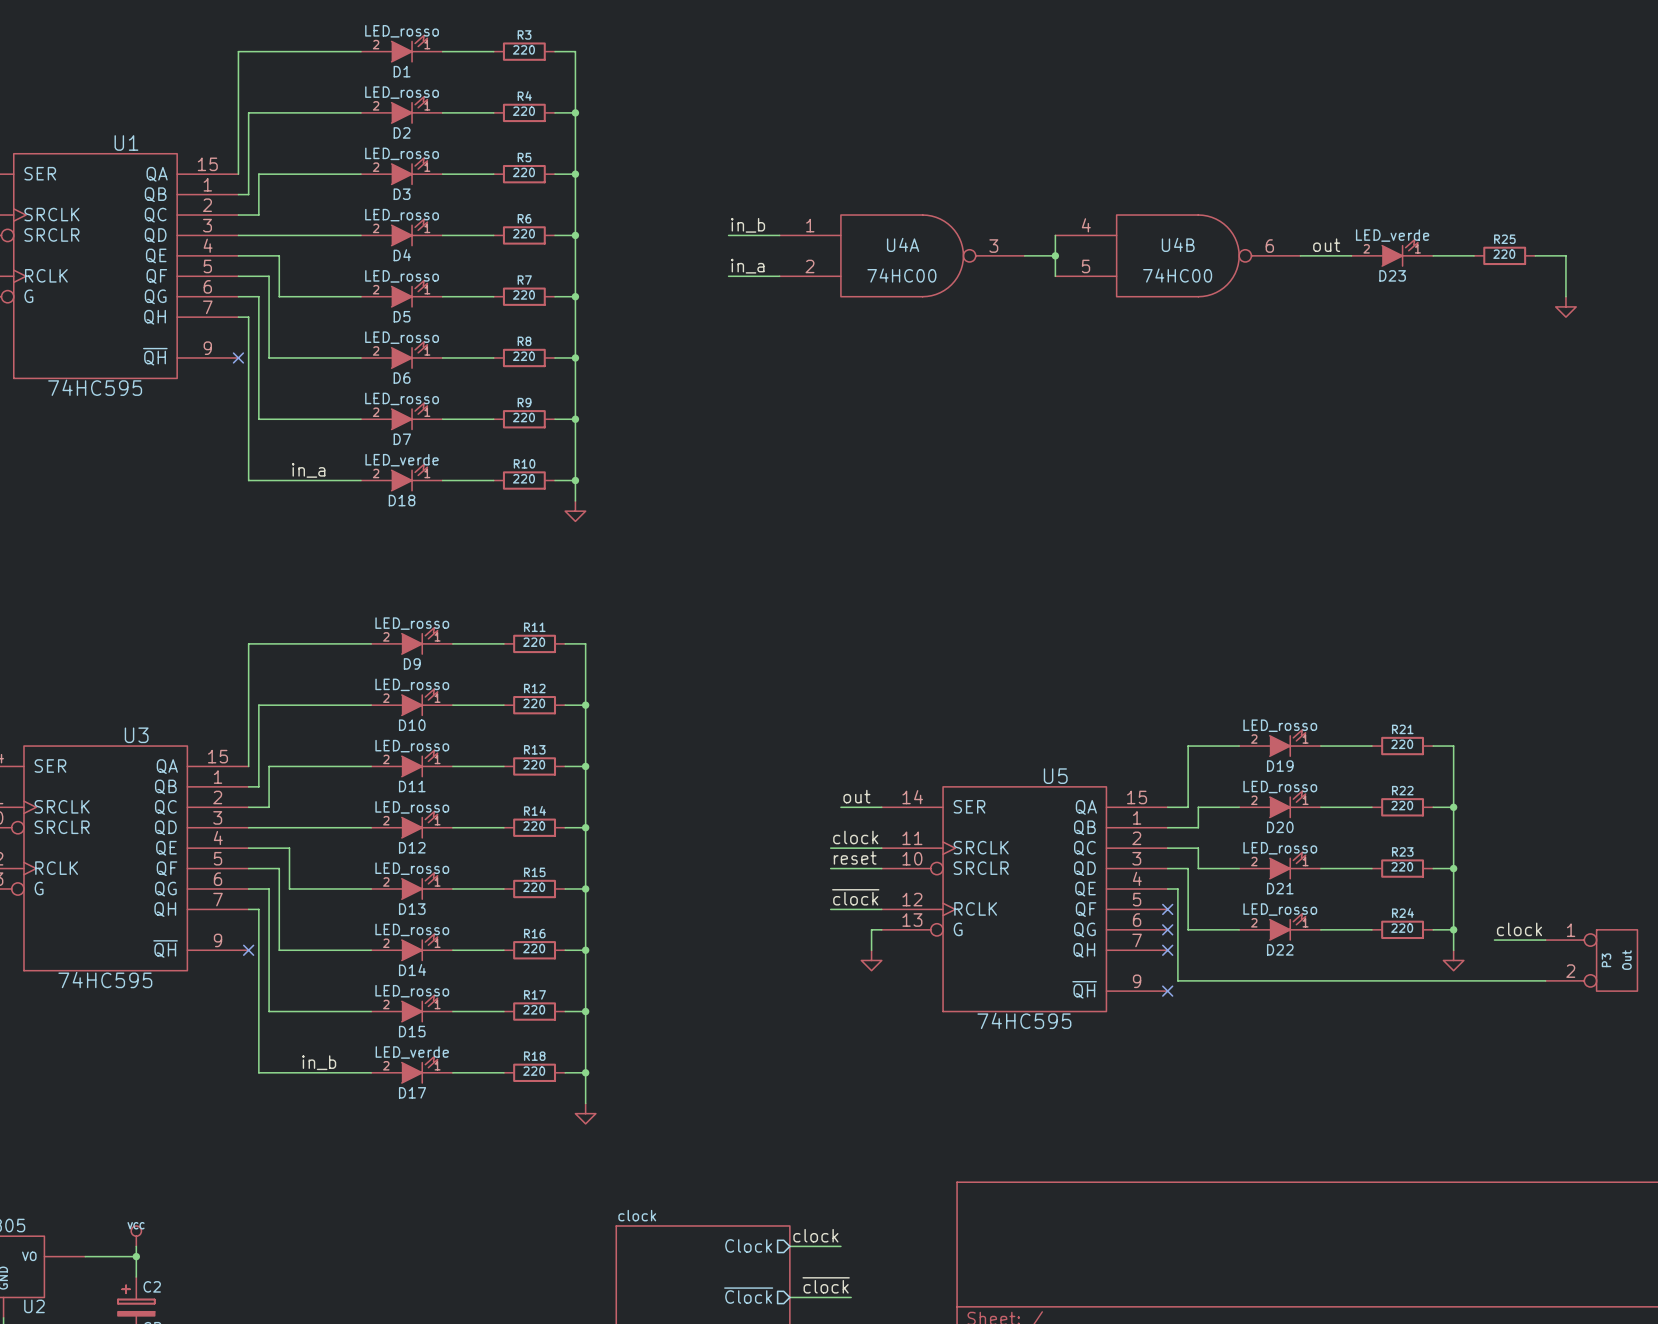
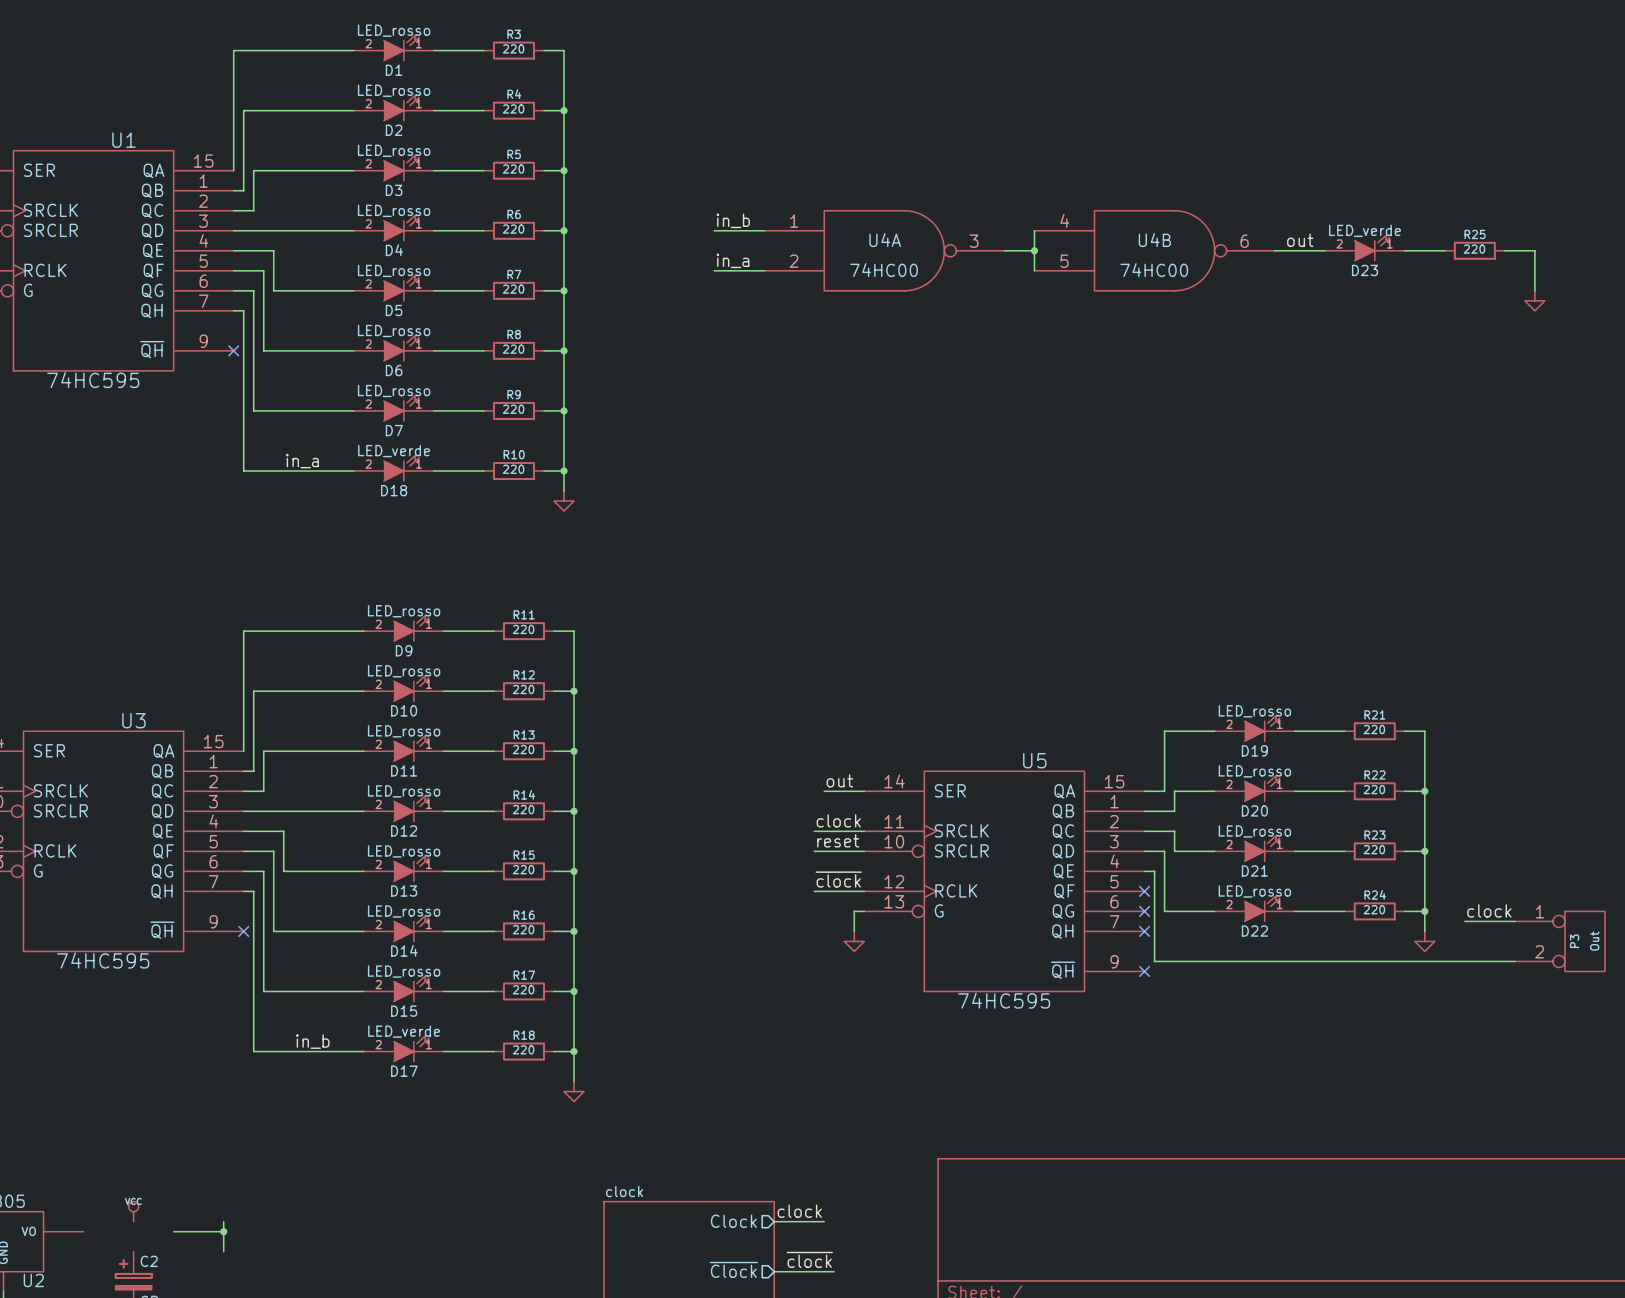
wire: (136, 1246) (136, 1277) -> (223, 1221) (223, 1251)
wire: (85, 1256) (136, 1256) -> (173, 1231) (223, 1231)
junction: (136, 1256) -> none
junction: none -> (223, 1231)

